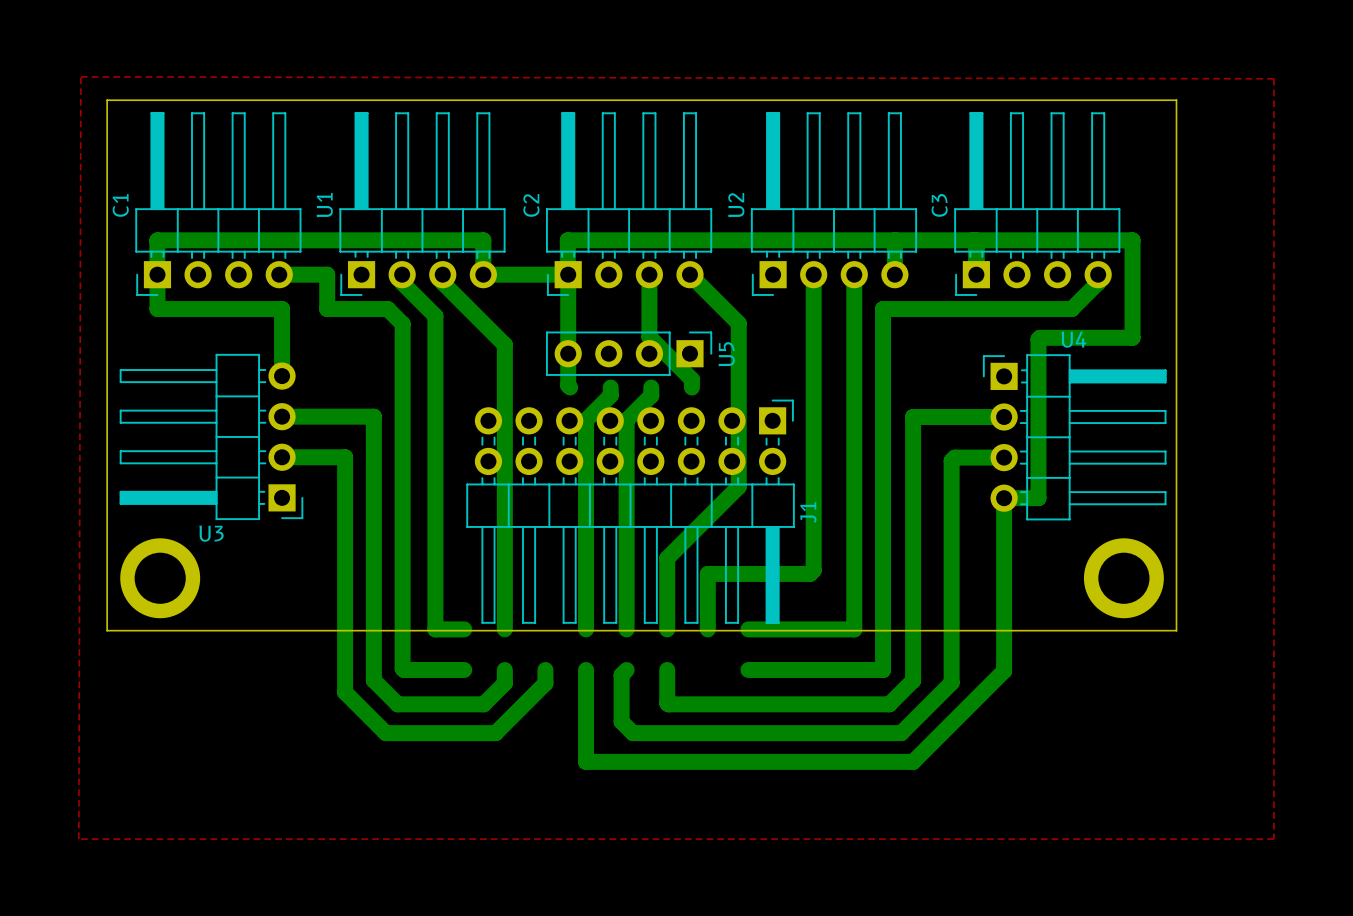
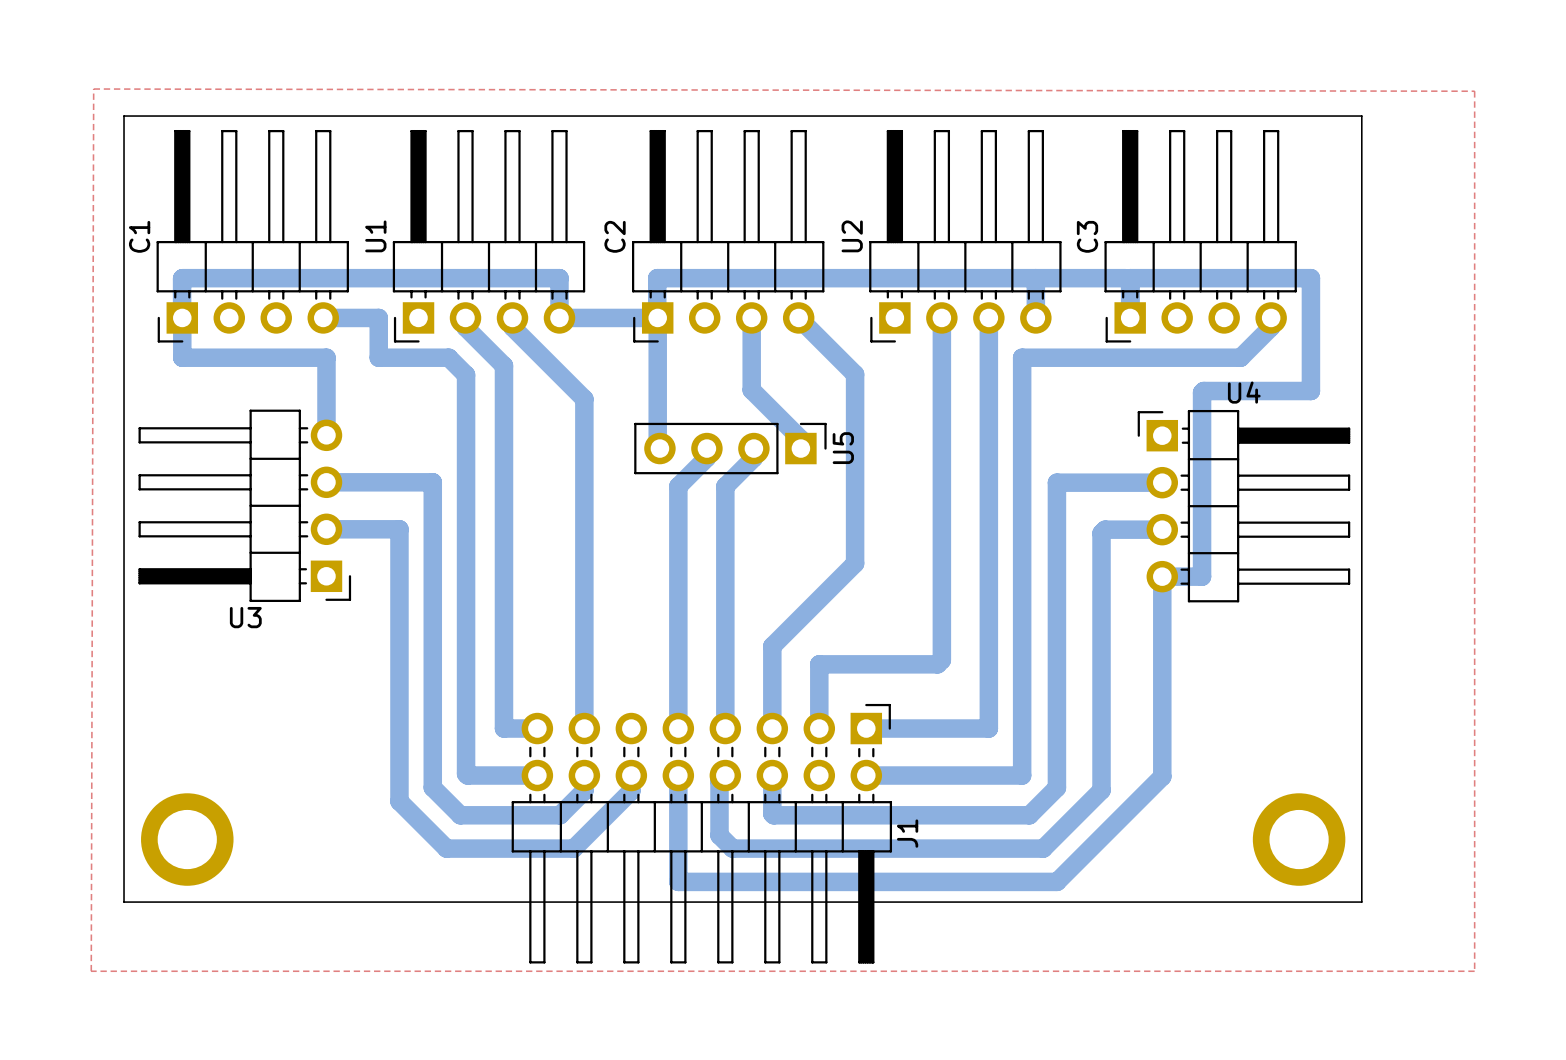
U5 position: (629, 353) -> (730, 448)
J1 position: (630, 511) -> (701, 833)
part position: (160, 578) -> (187, 839)
part position: (1123, 578) -> (1299, 839)
board edge: (107, 630) (1176, 630) -> (124, 730) (124, 902) (1361, 902) (1361, 730)

